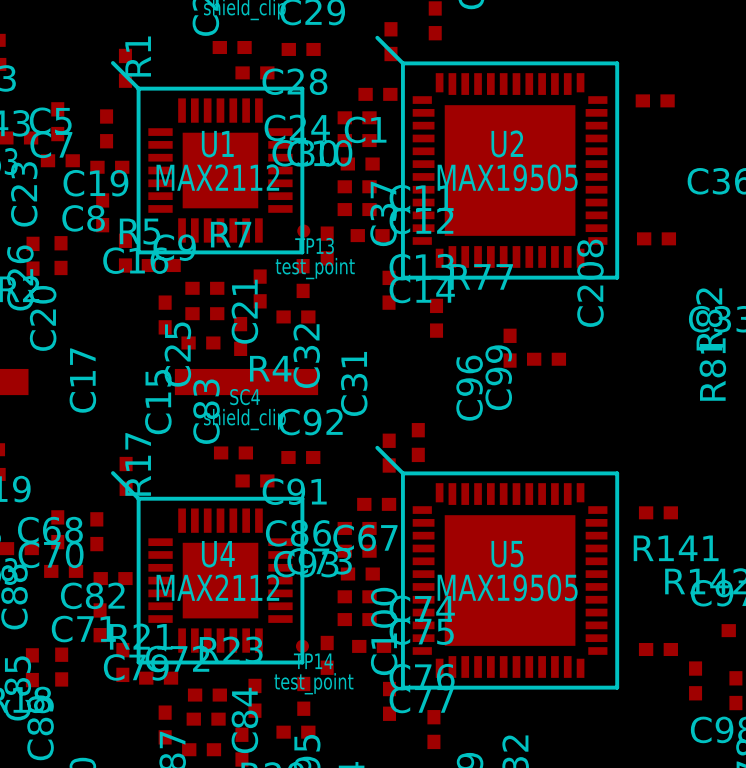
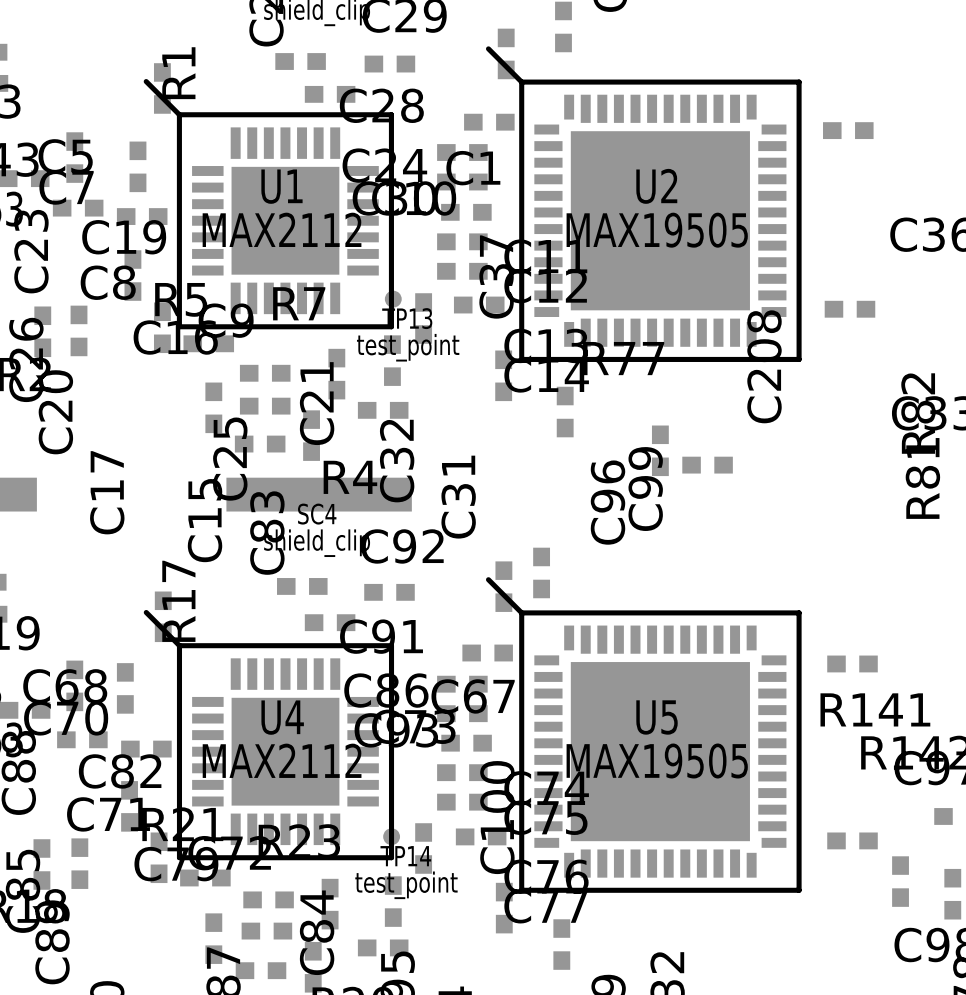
U2 footprint: [375, 35, 620, 280] -> [485, 46, 802, 362]
U1 footprint: [110, 61, 305, 255] -> [143, 79, 394, 330]
U5 footprint: [375, 445, 620, 690] -> [485, 577, 802, 893]
U4 footprint: [111, 471, 305, 665] -> [143, 609, 395, 861]

